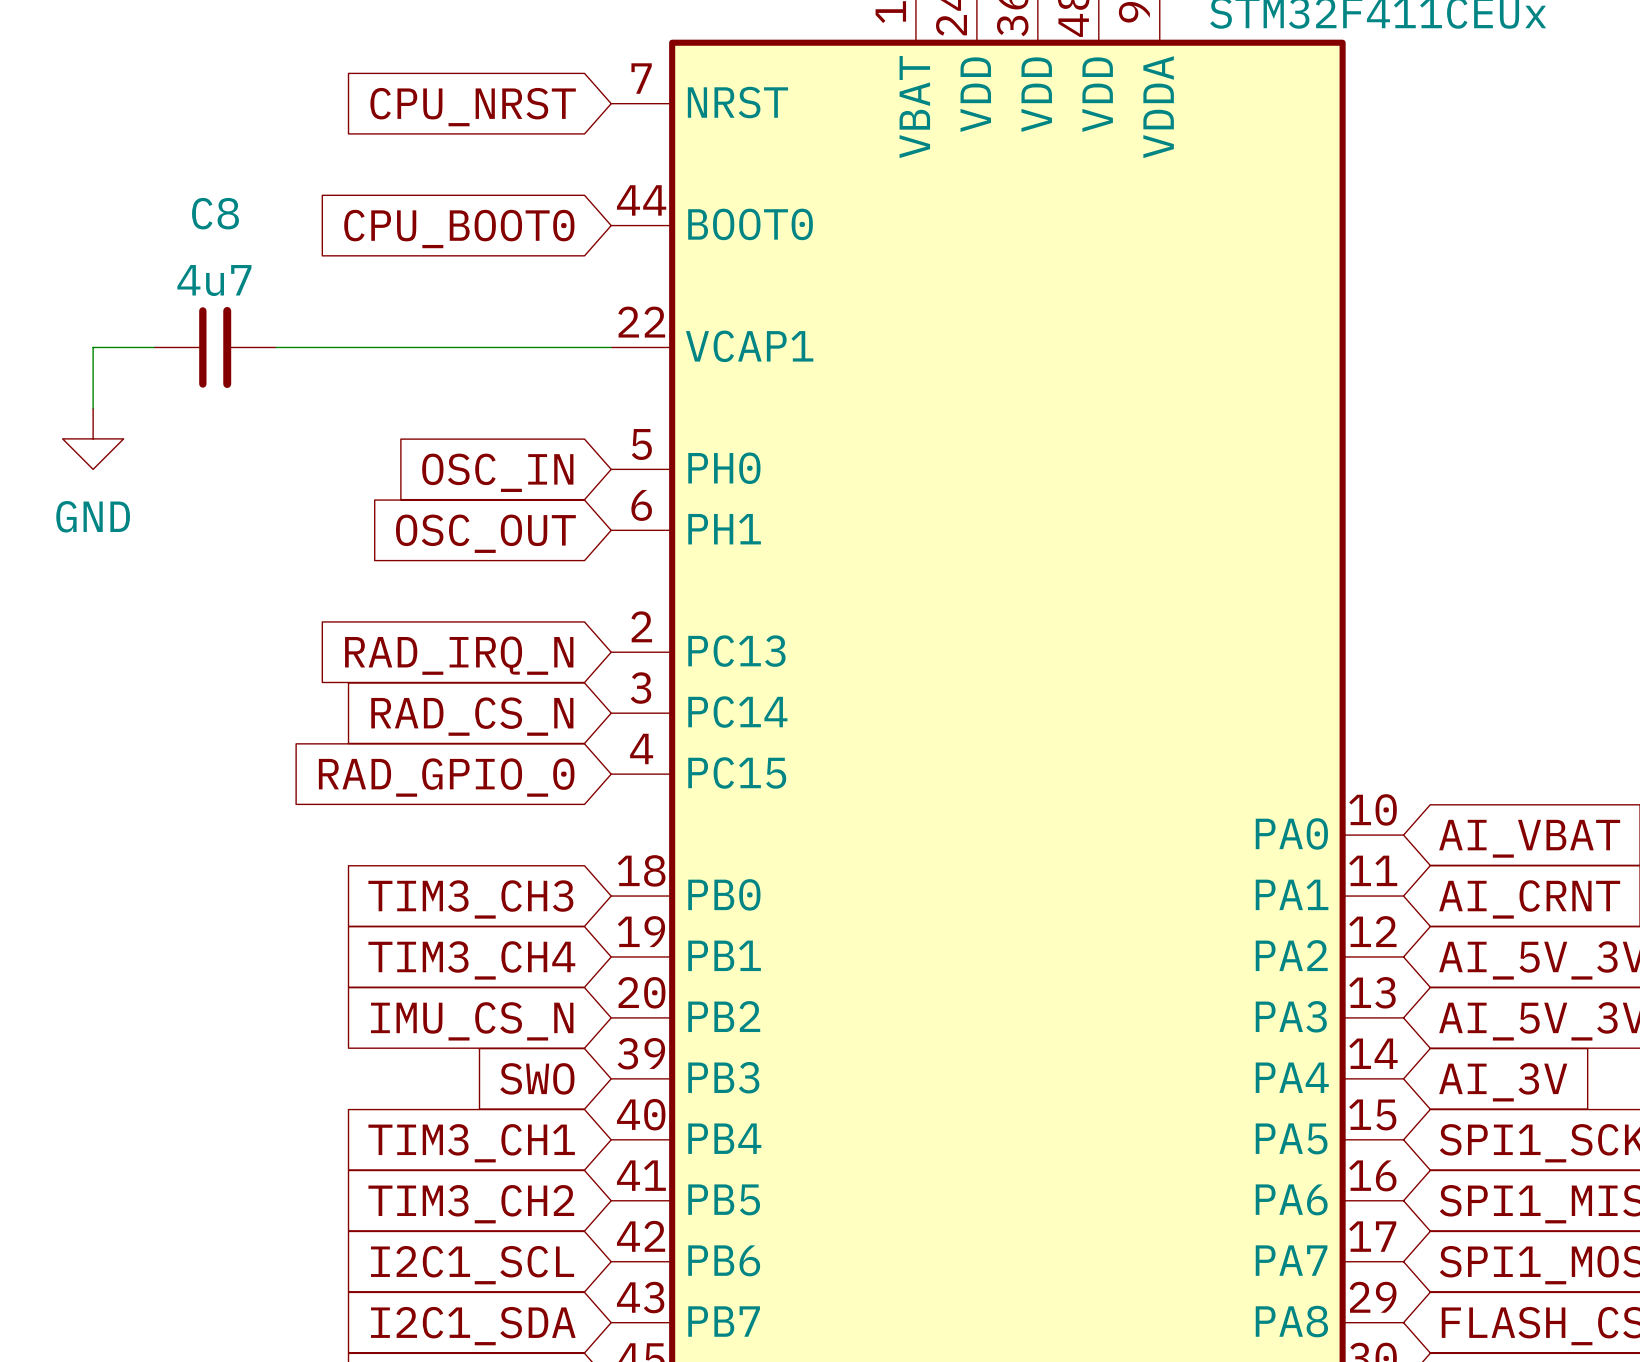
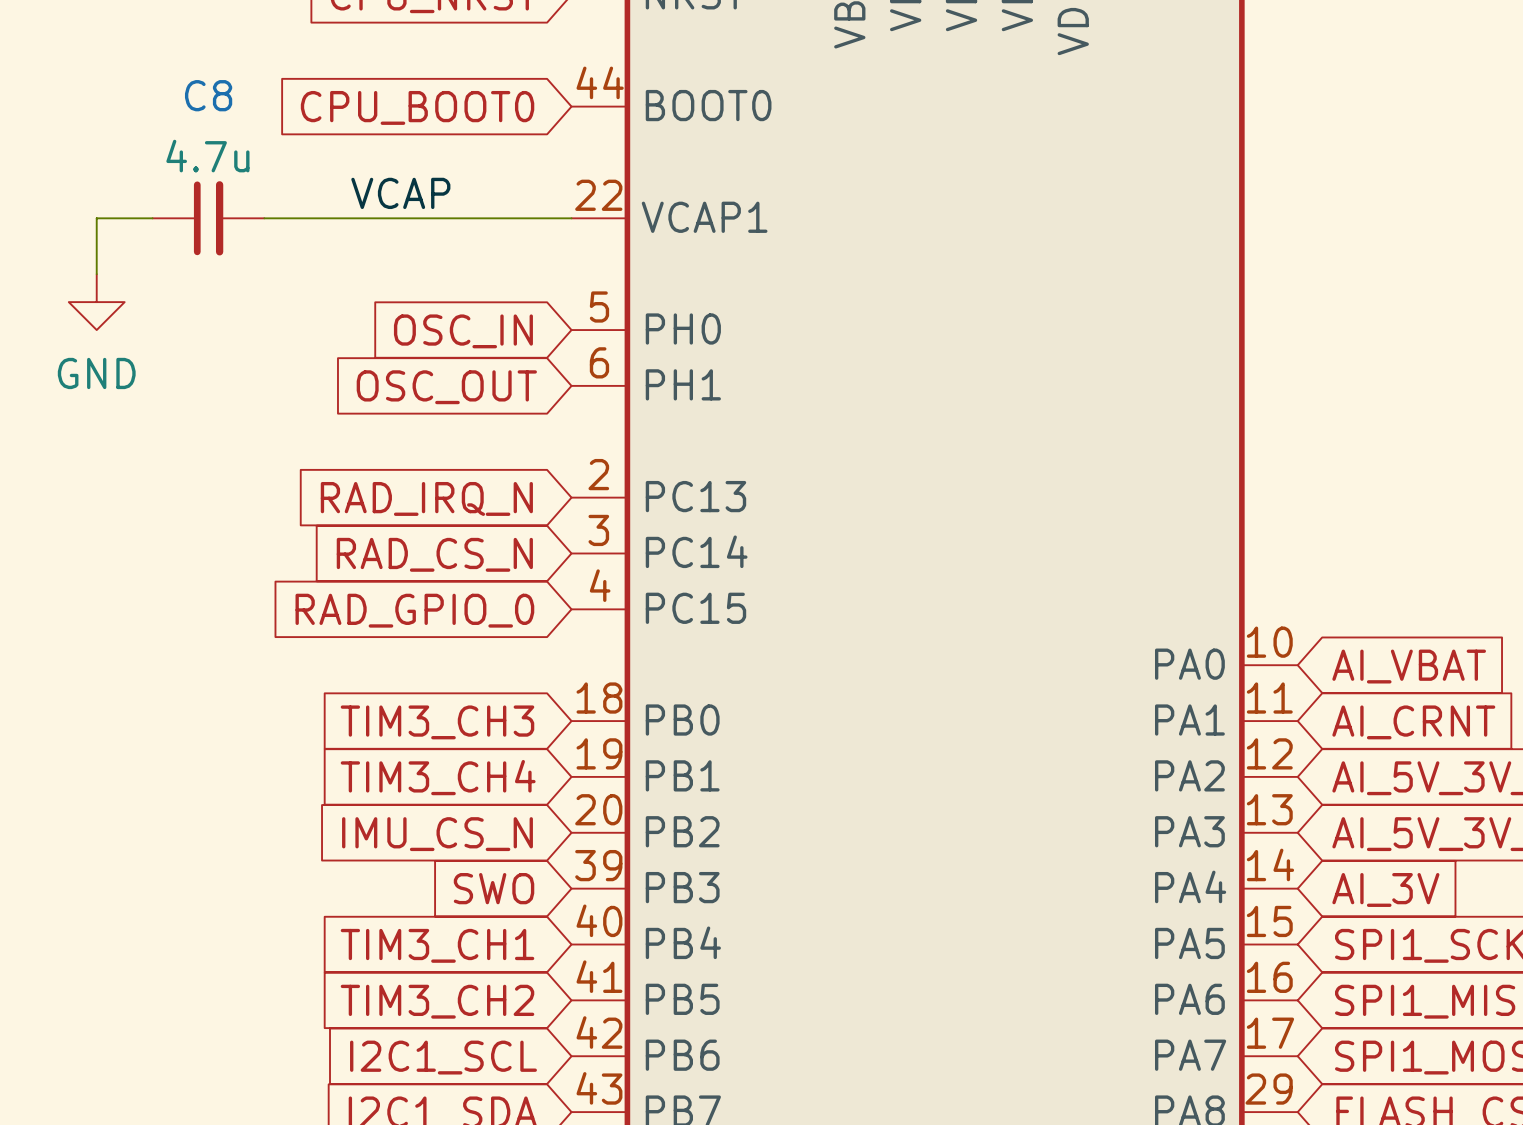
C8 value: 4u7 (214, 280) -> 4.7u (207, 156)
label: none -> VCAP (400, 193)

